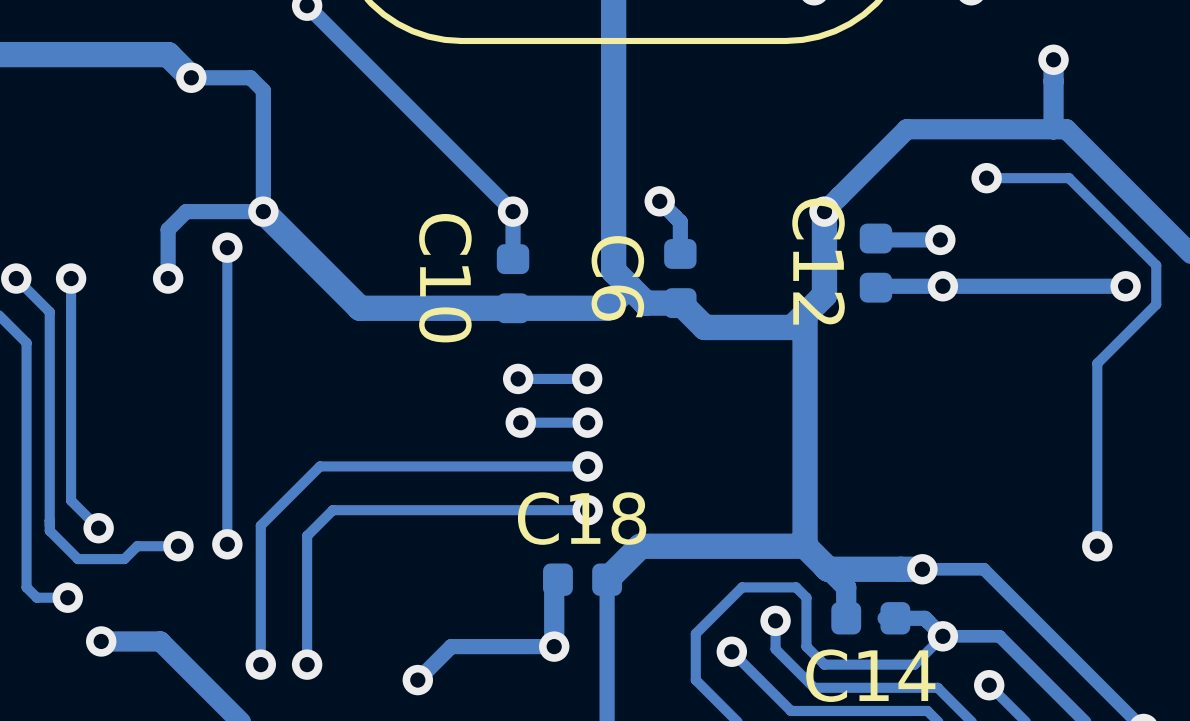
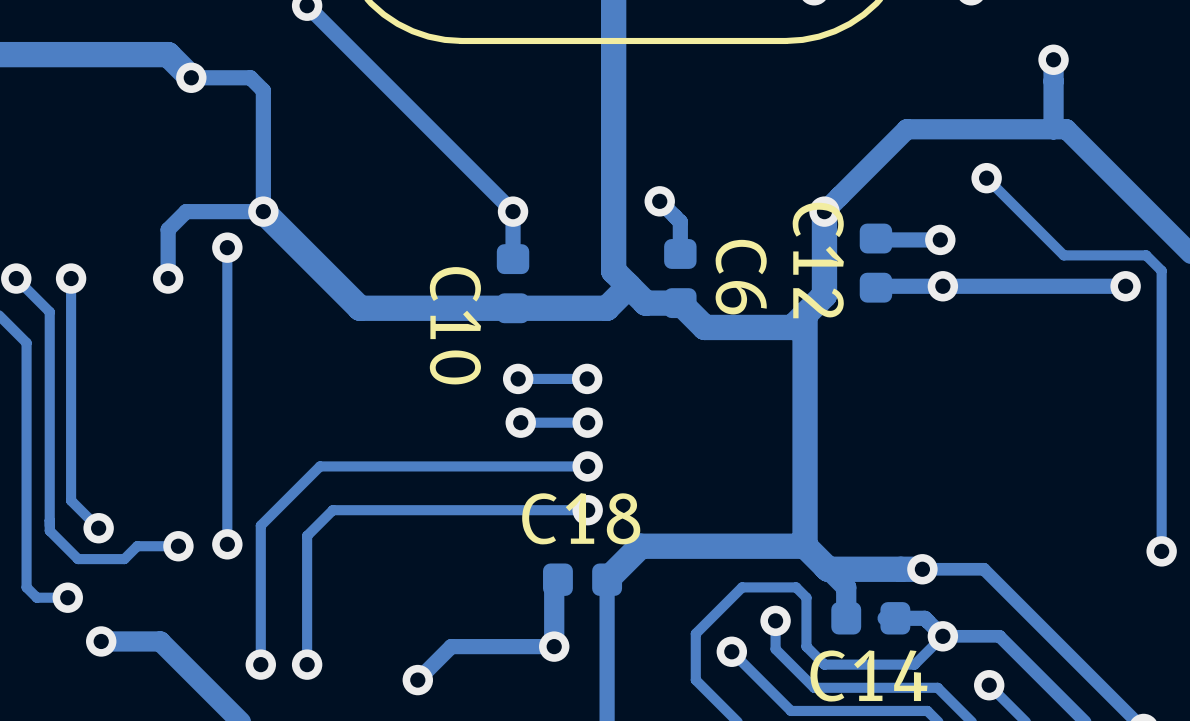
track: (986, 178) (1068, 178) (1146, 255) -> (986, 178) (1063, 255) (1146, 255)
track: (1156, 265) (1156, 304) (1097, 363) (1097, 546) -> (1156, 265) (1161, 270) (1161, 551)
C10 name position: C10 (445, 278) -> C10 (455, 325)
C6 name position: C6 (617, 278) -> C6 (741, 277)
via position: (1097, 546) -> (1161, 551)

